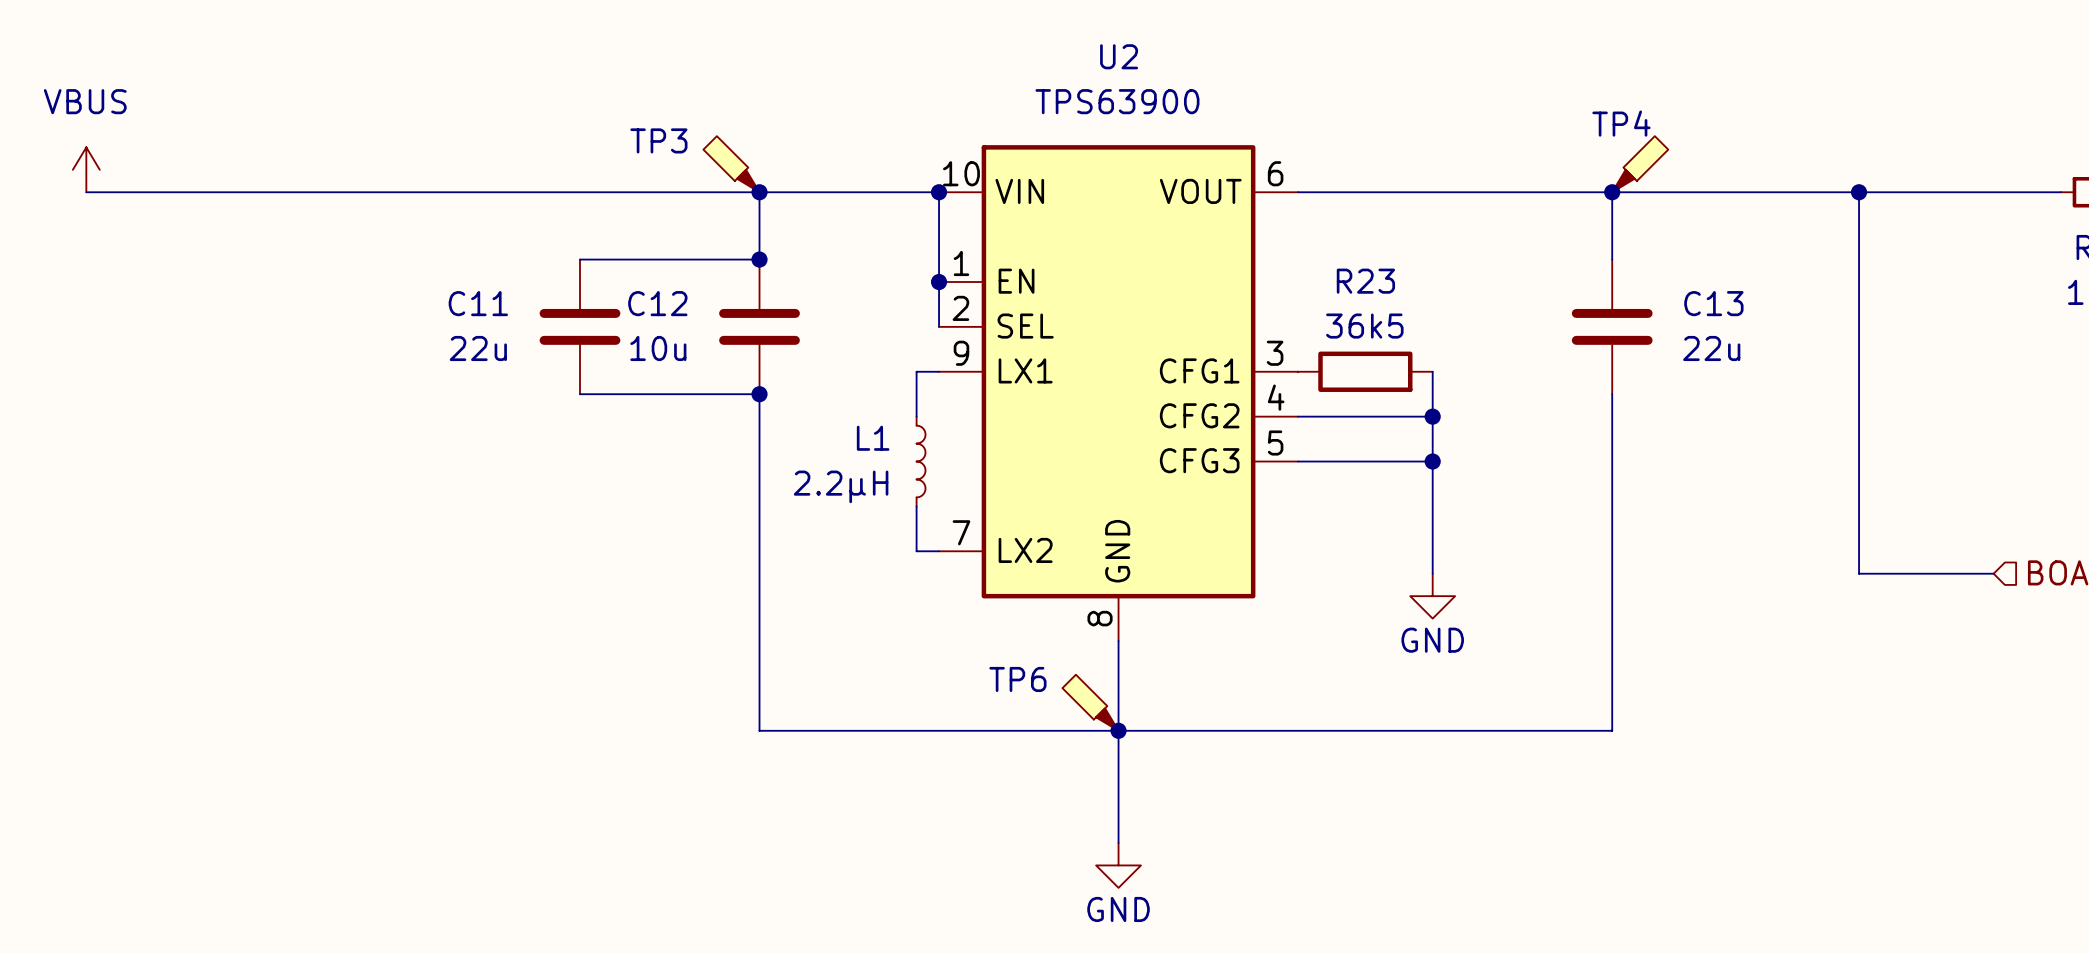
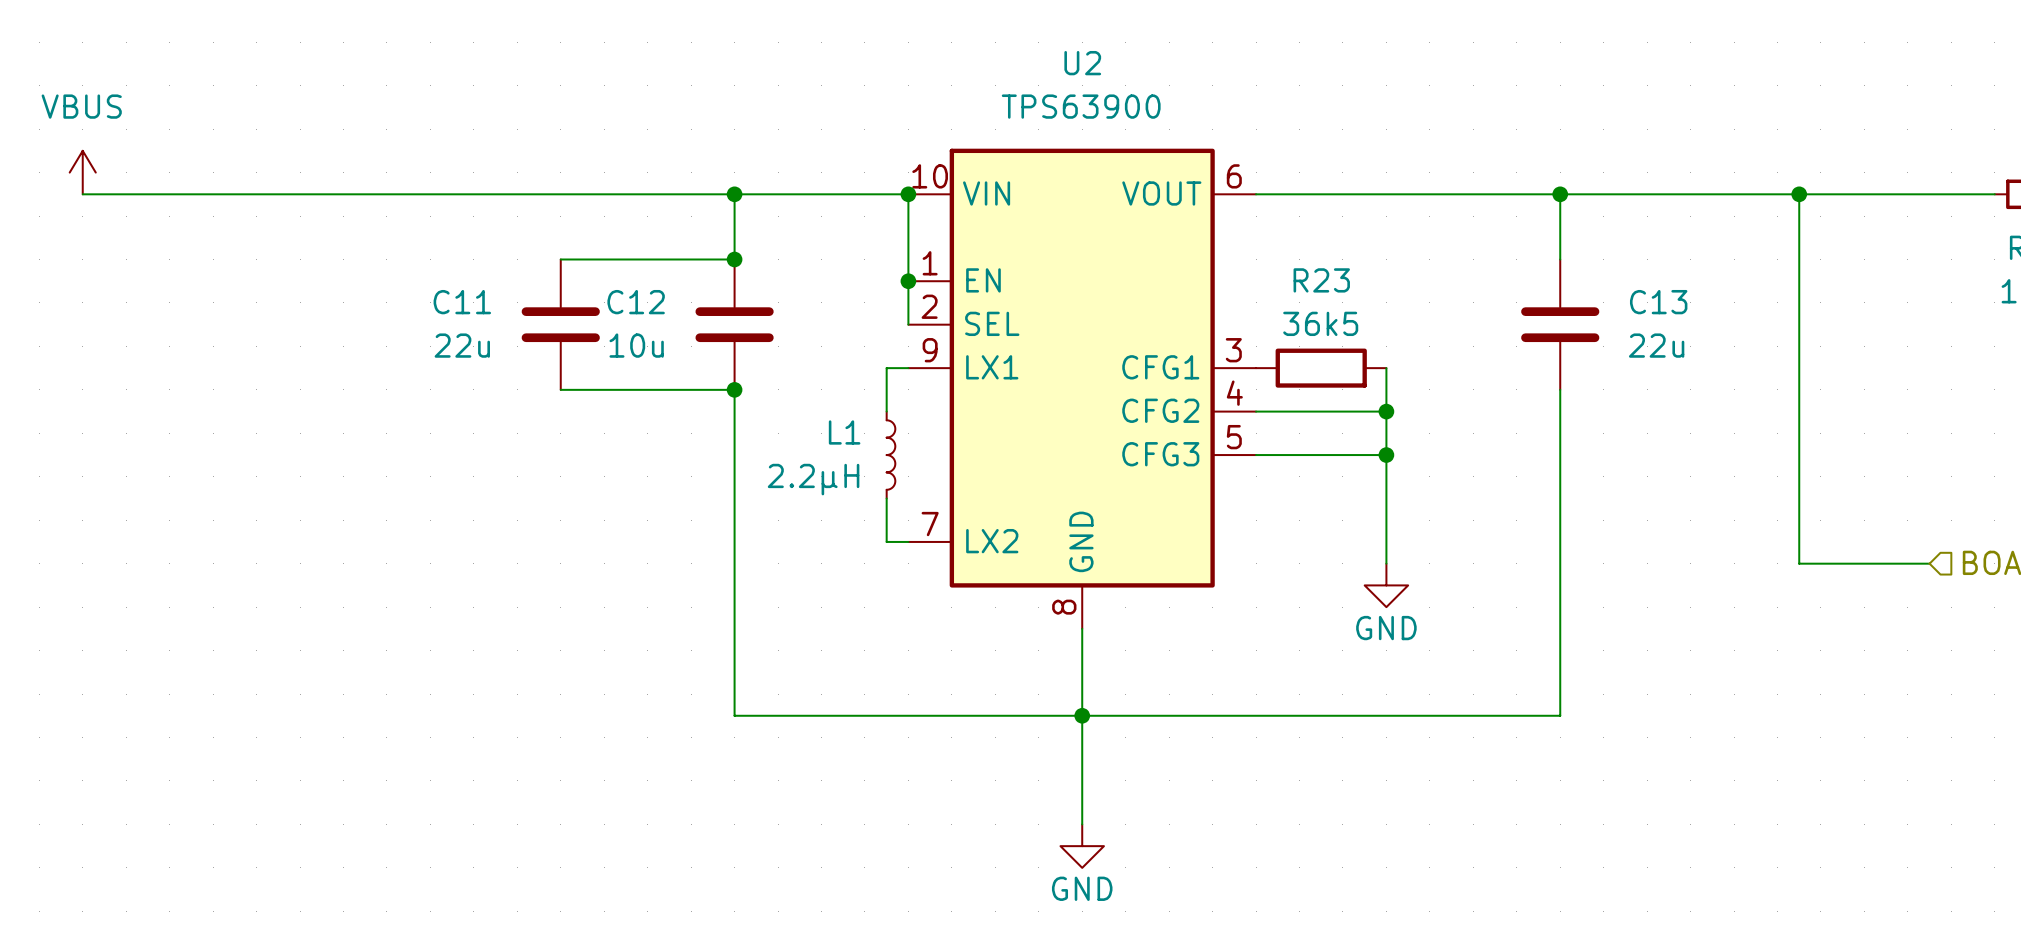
TP3: (731, 164) -> none
TP4: (1640, 164) -> none
TP6: (1090, 702) -> none

